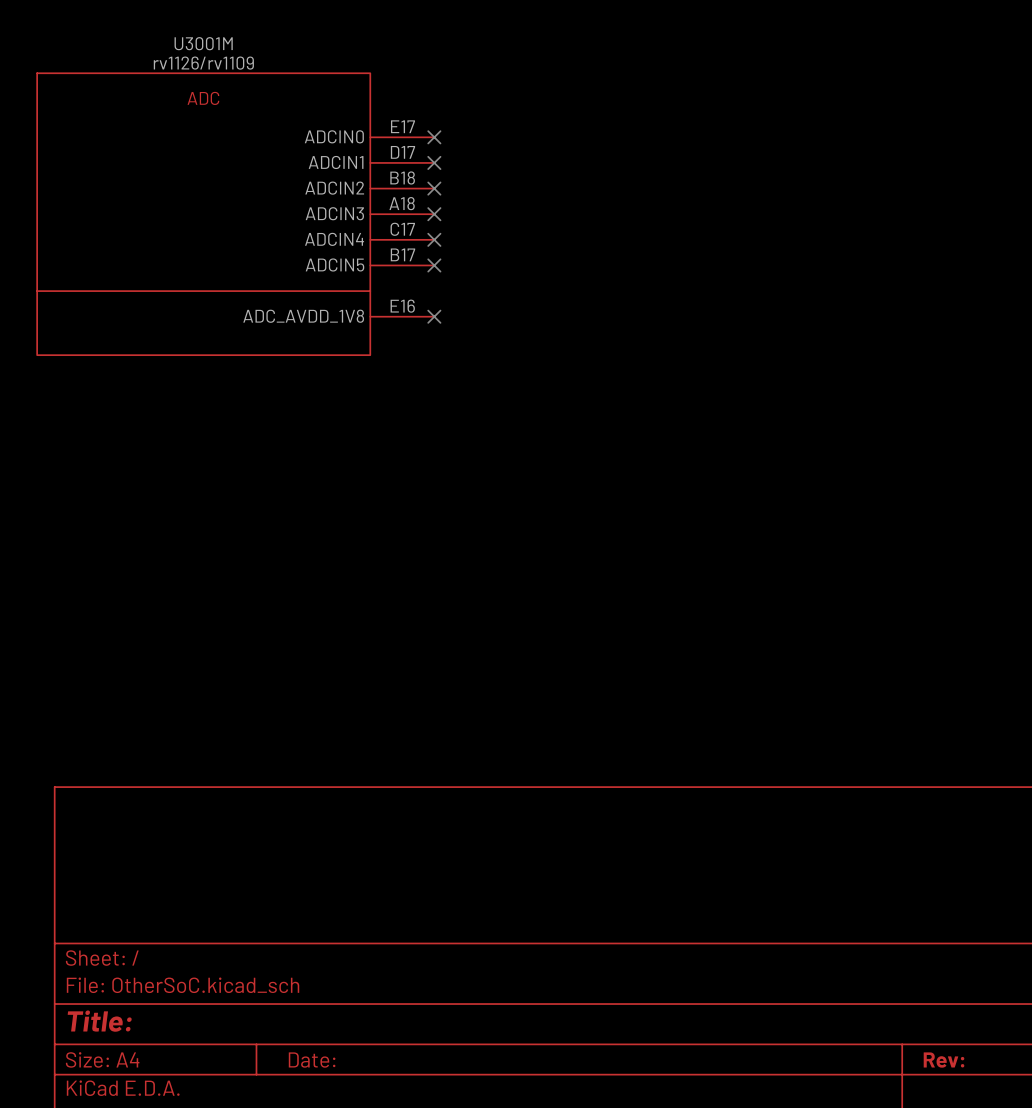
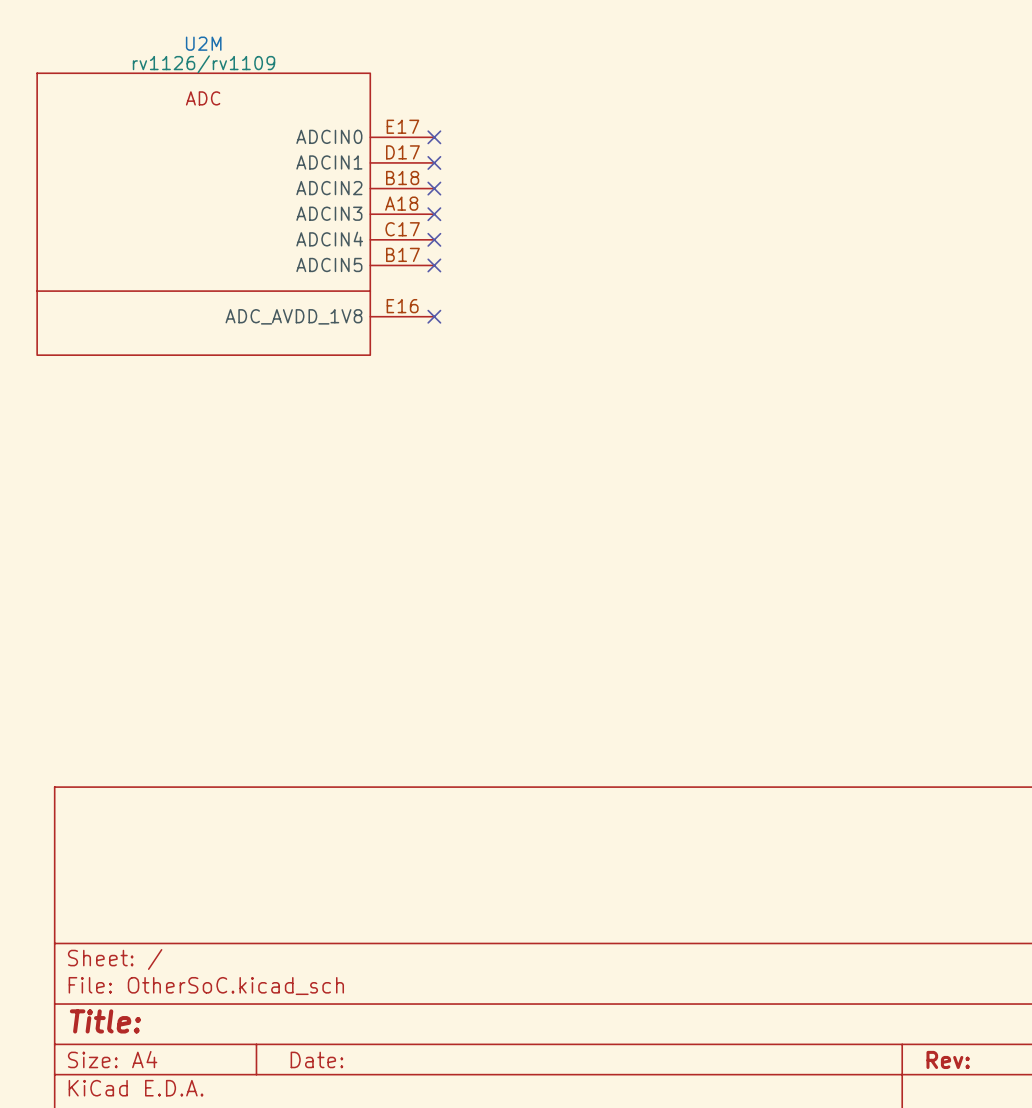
U3001M name: U3001M (203, 43) -> U2M (203, 43)

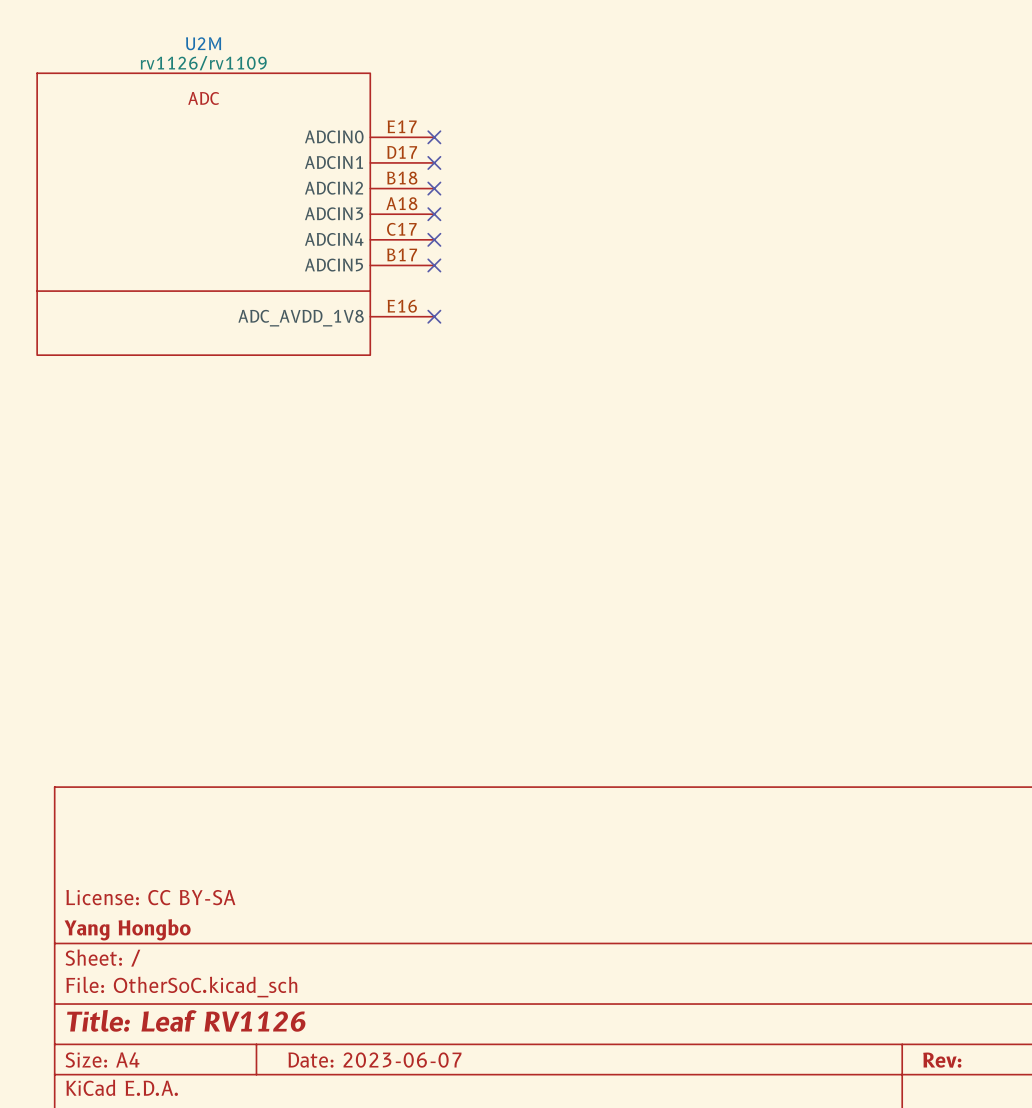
title block: none -> License: CC BY-SA (150, 897)
title block: none -> Yang Hongbo (127, 929)
title block: Title: (105, 1021) -> Title: Leaf RV1126 (186, 1020)
title block: Date: (316, 1059) -> Date: 2023-06-07 (374, 1060)

